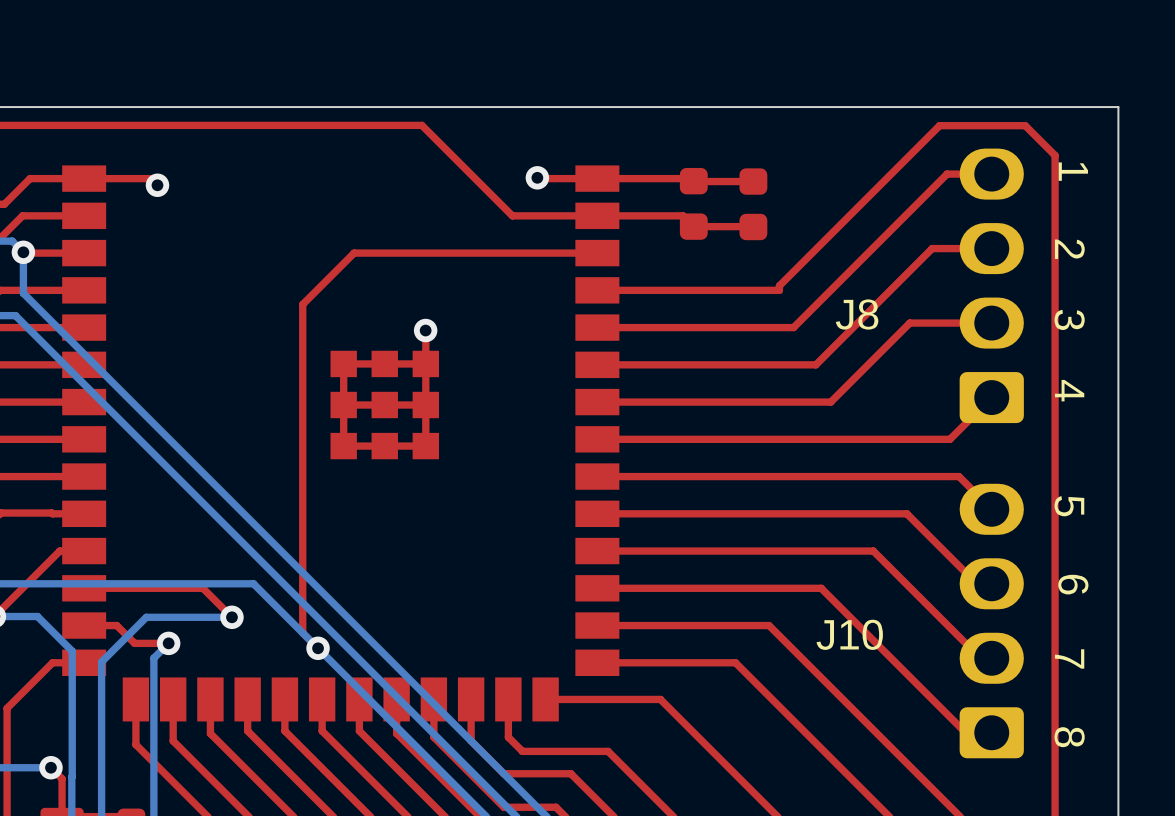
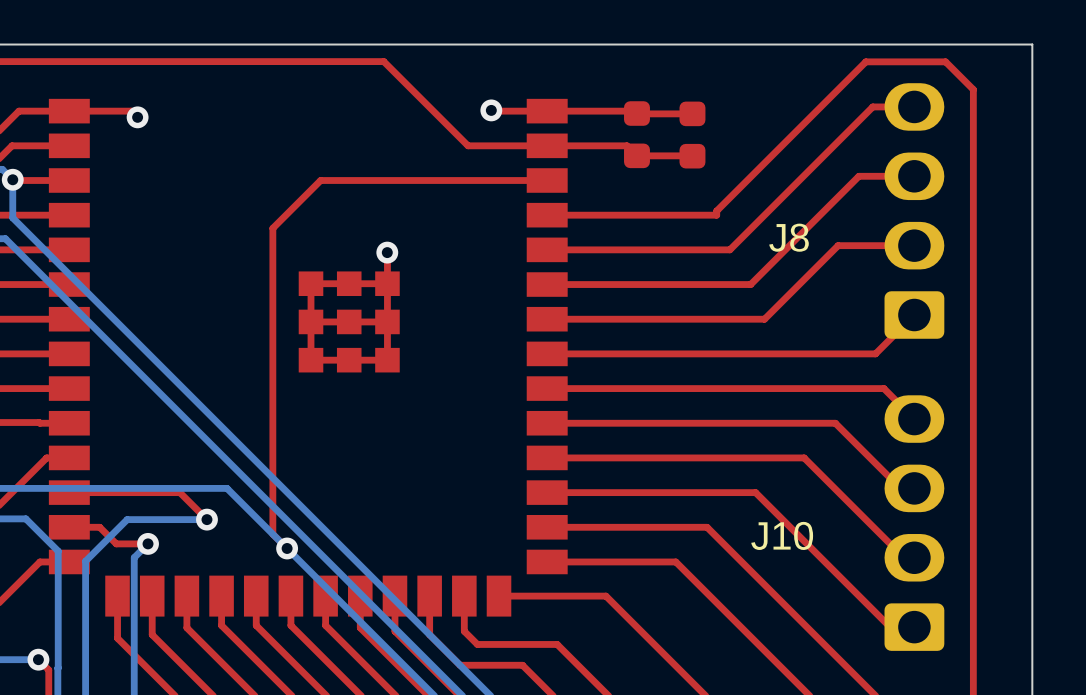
text: 1 (1073, 171) -> none
text: 2 (1069, 249) -> none
text: 3 (1069, 319) -> none
text: 4 (1069, 390) -> none
text: 5 (1069, 506) -> none
text: 6 (1073, 584) -> none
text: 7 (1069, 658) -> none
text: 8 (1069, 737) -> none

